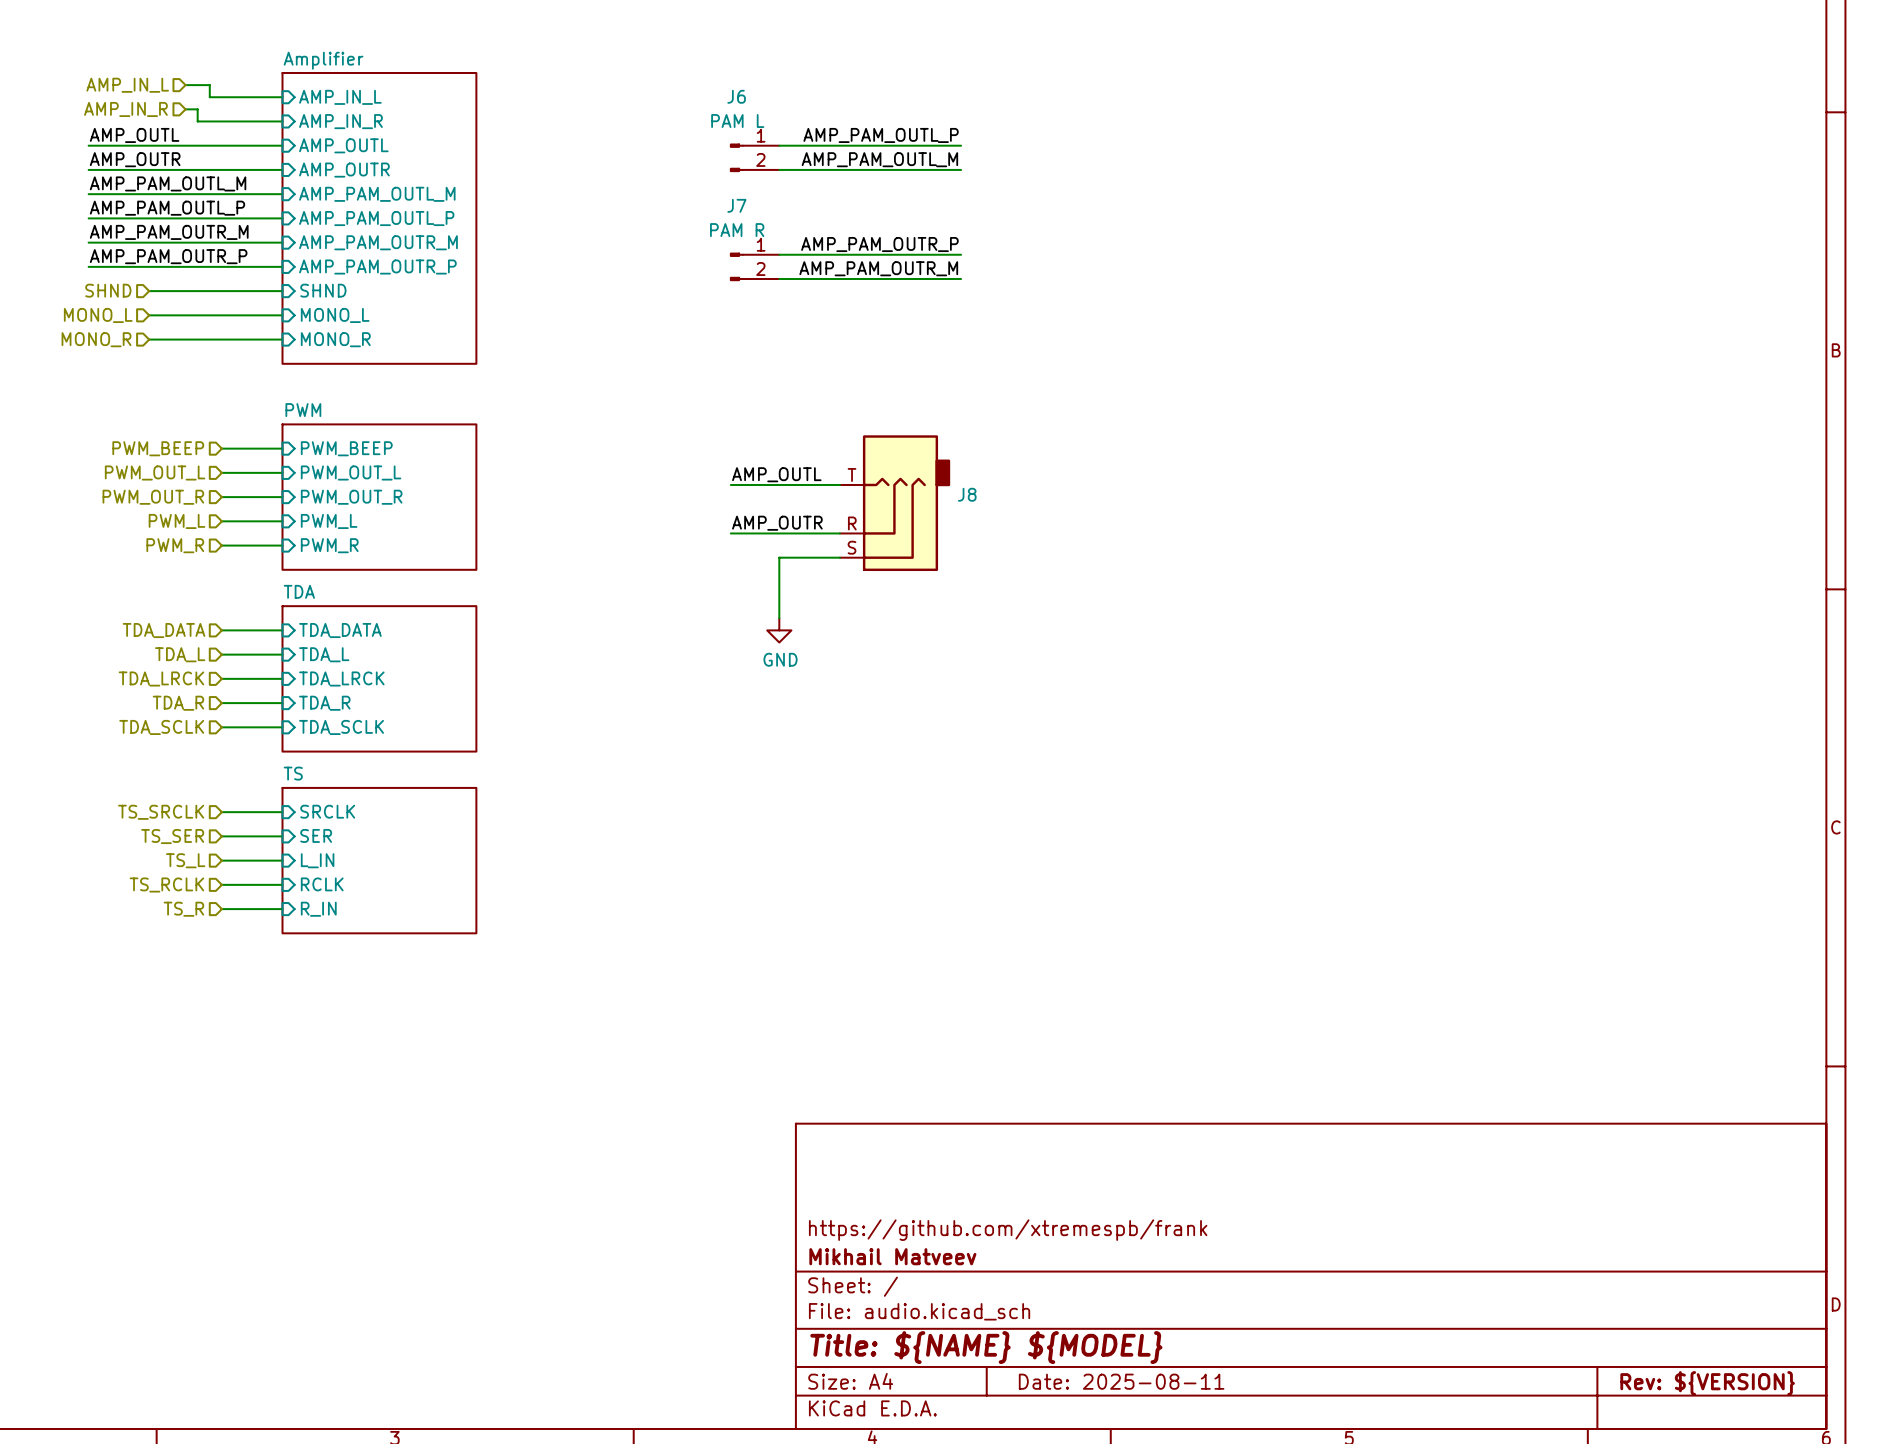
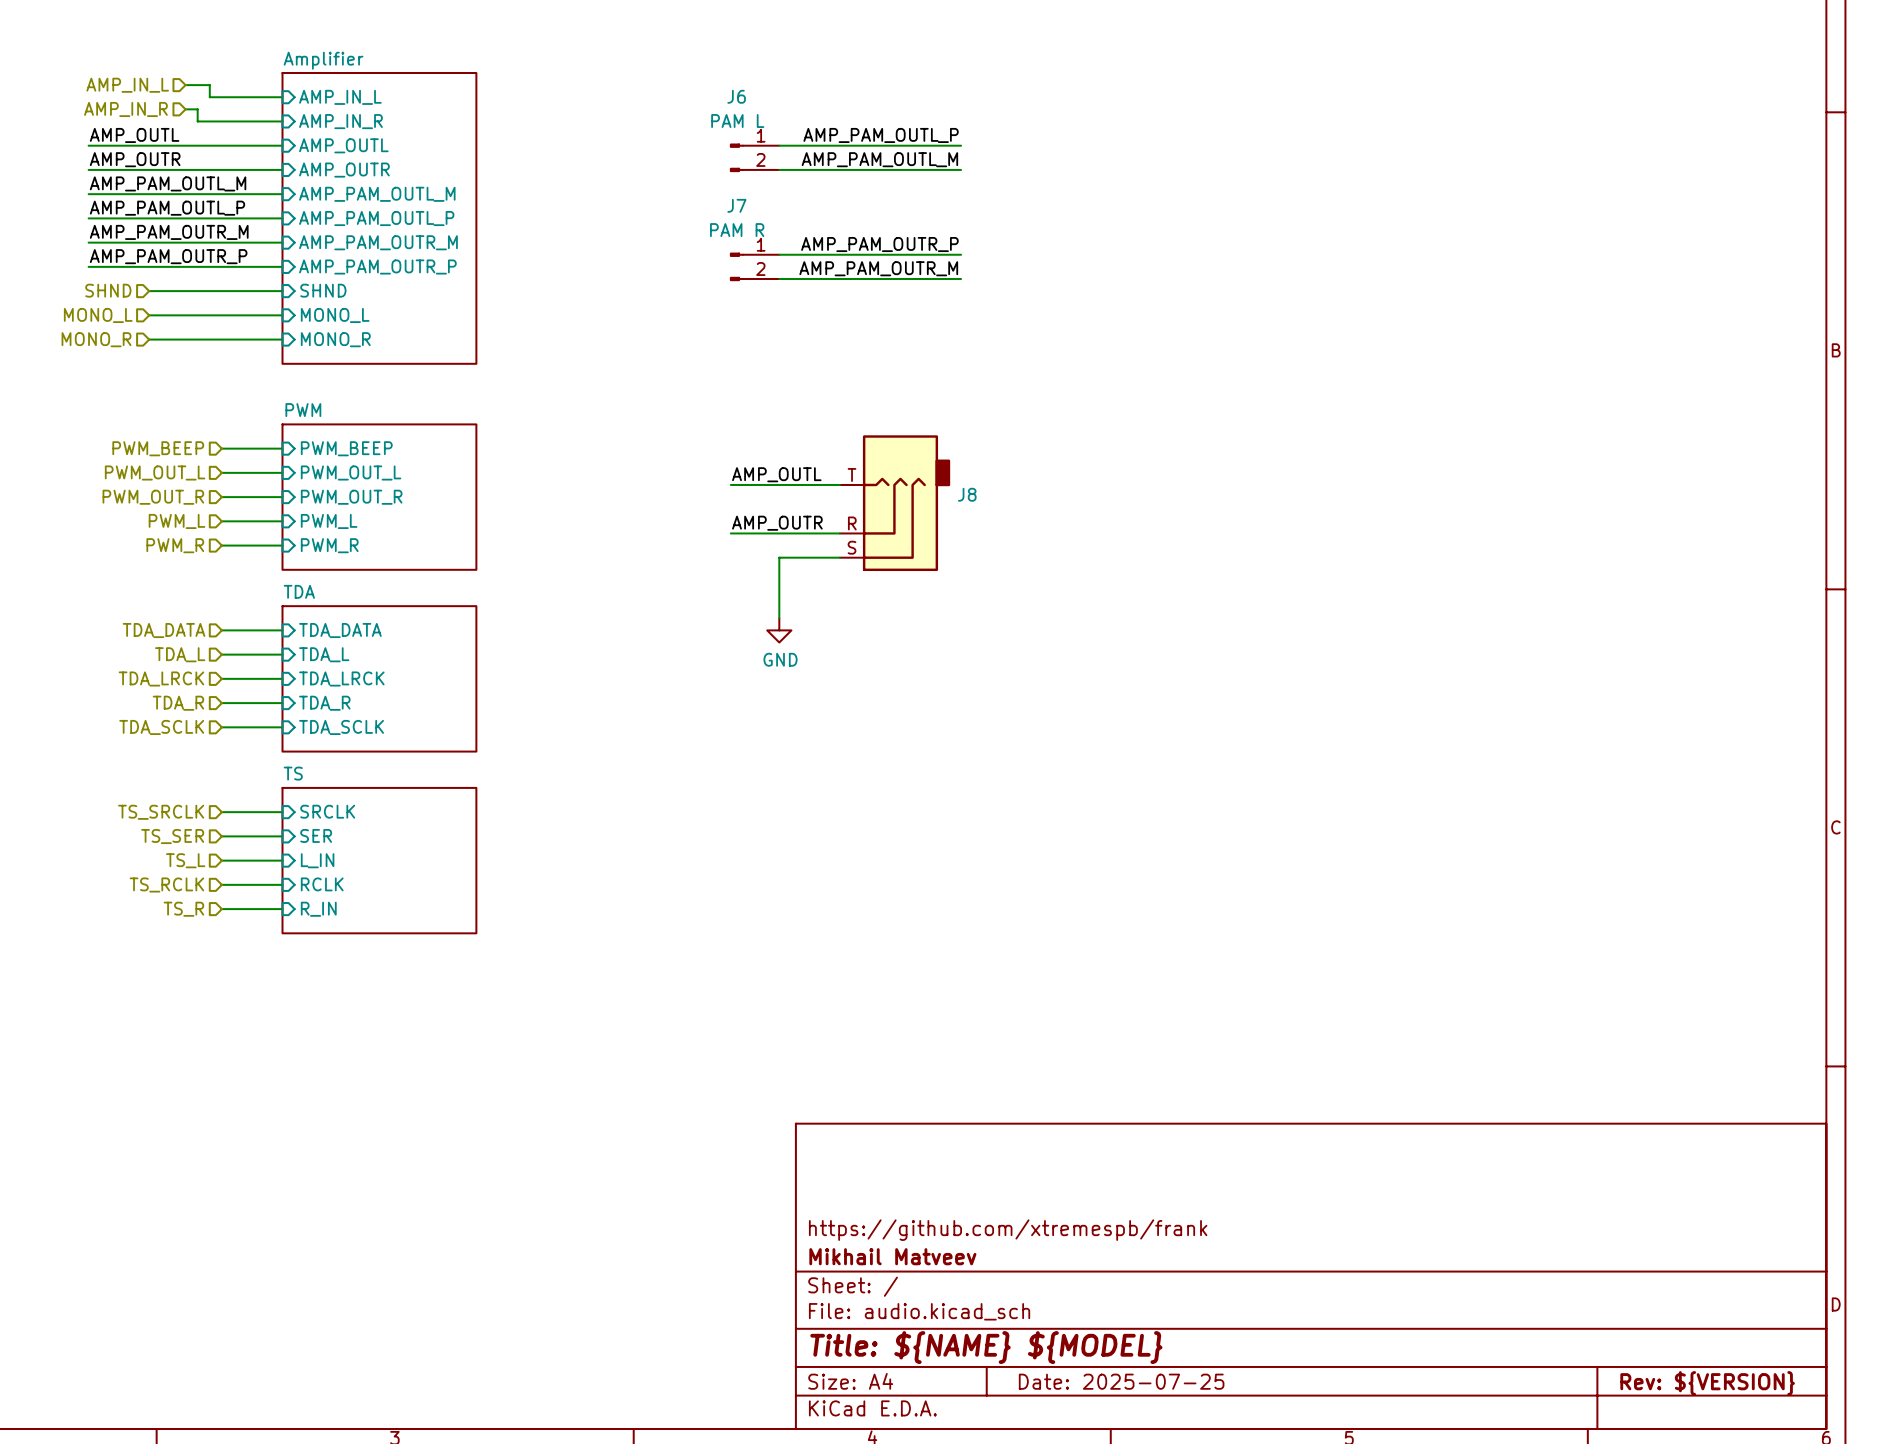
title block: Date: 2025-08-11 (1121, 1381) -> Date: 2025-07-25 (1121, 1381)

